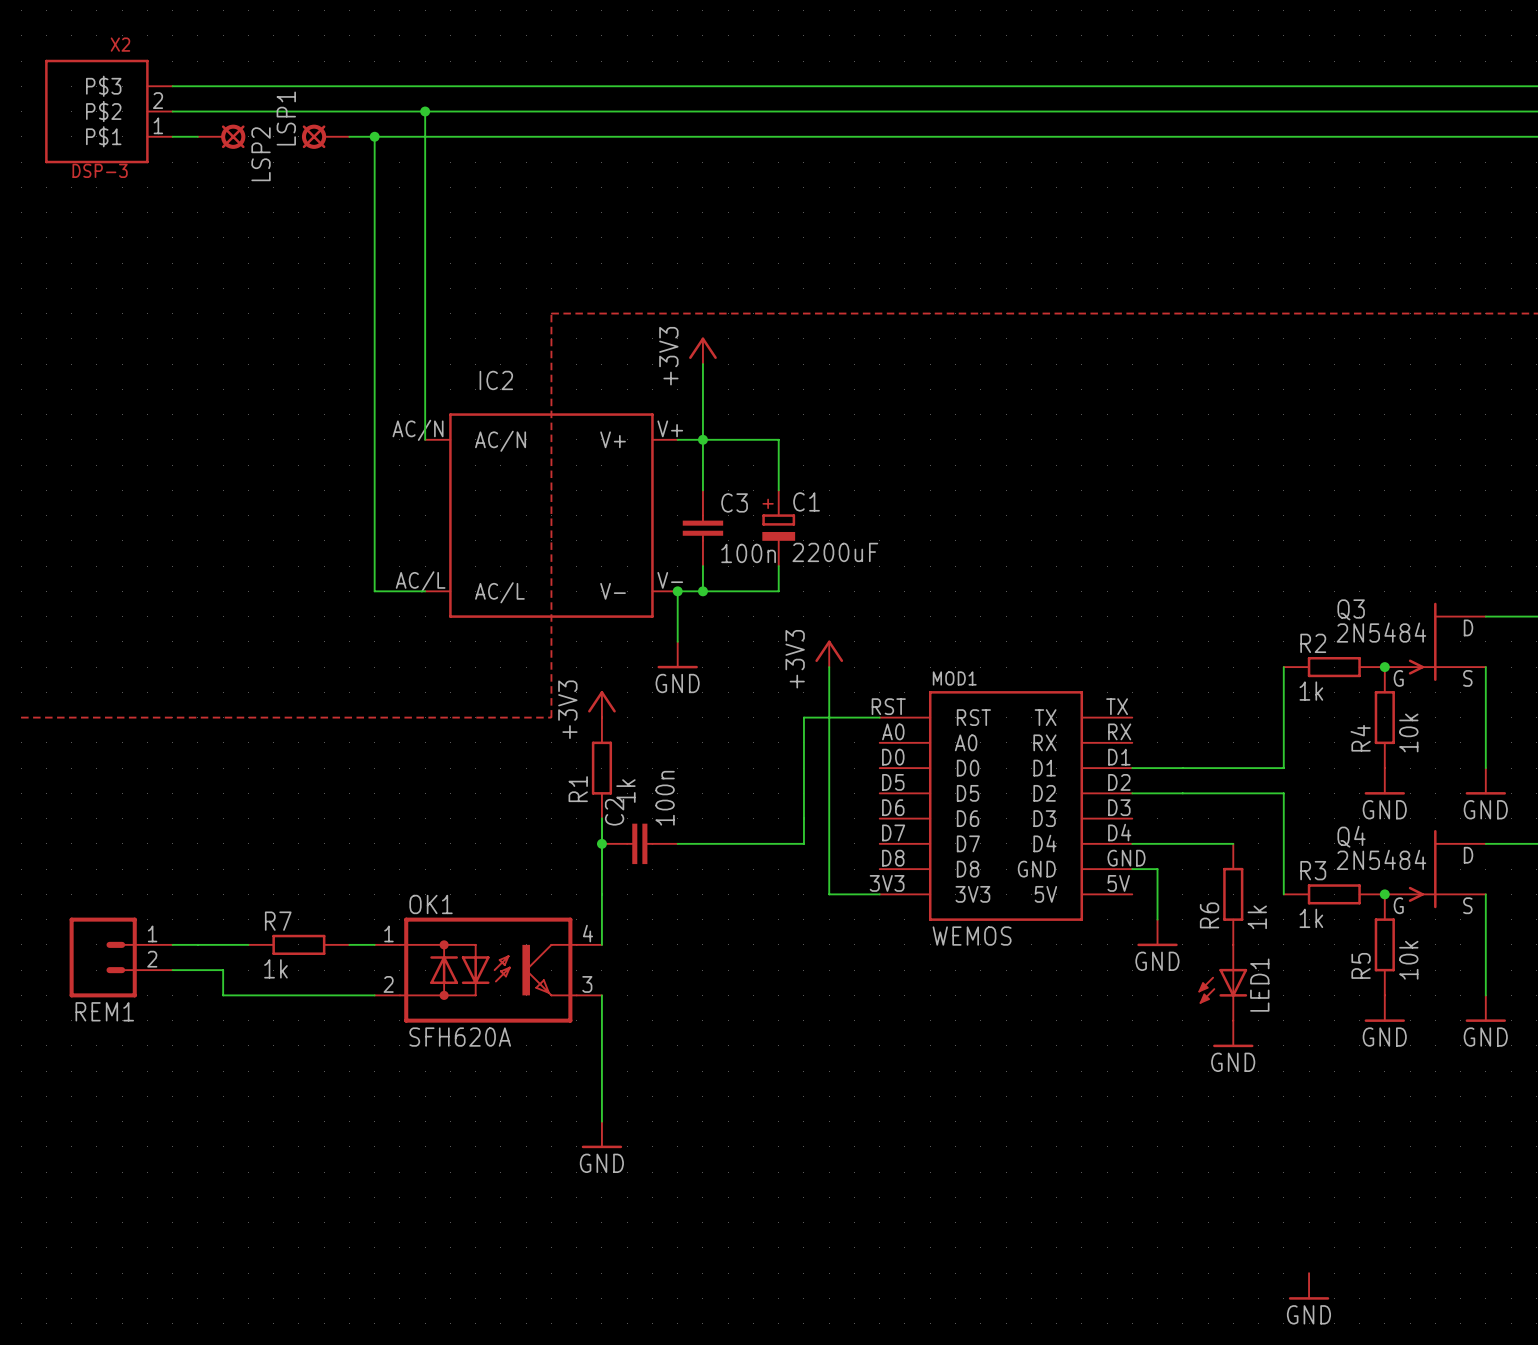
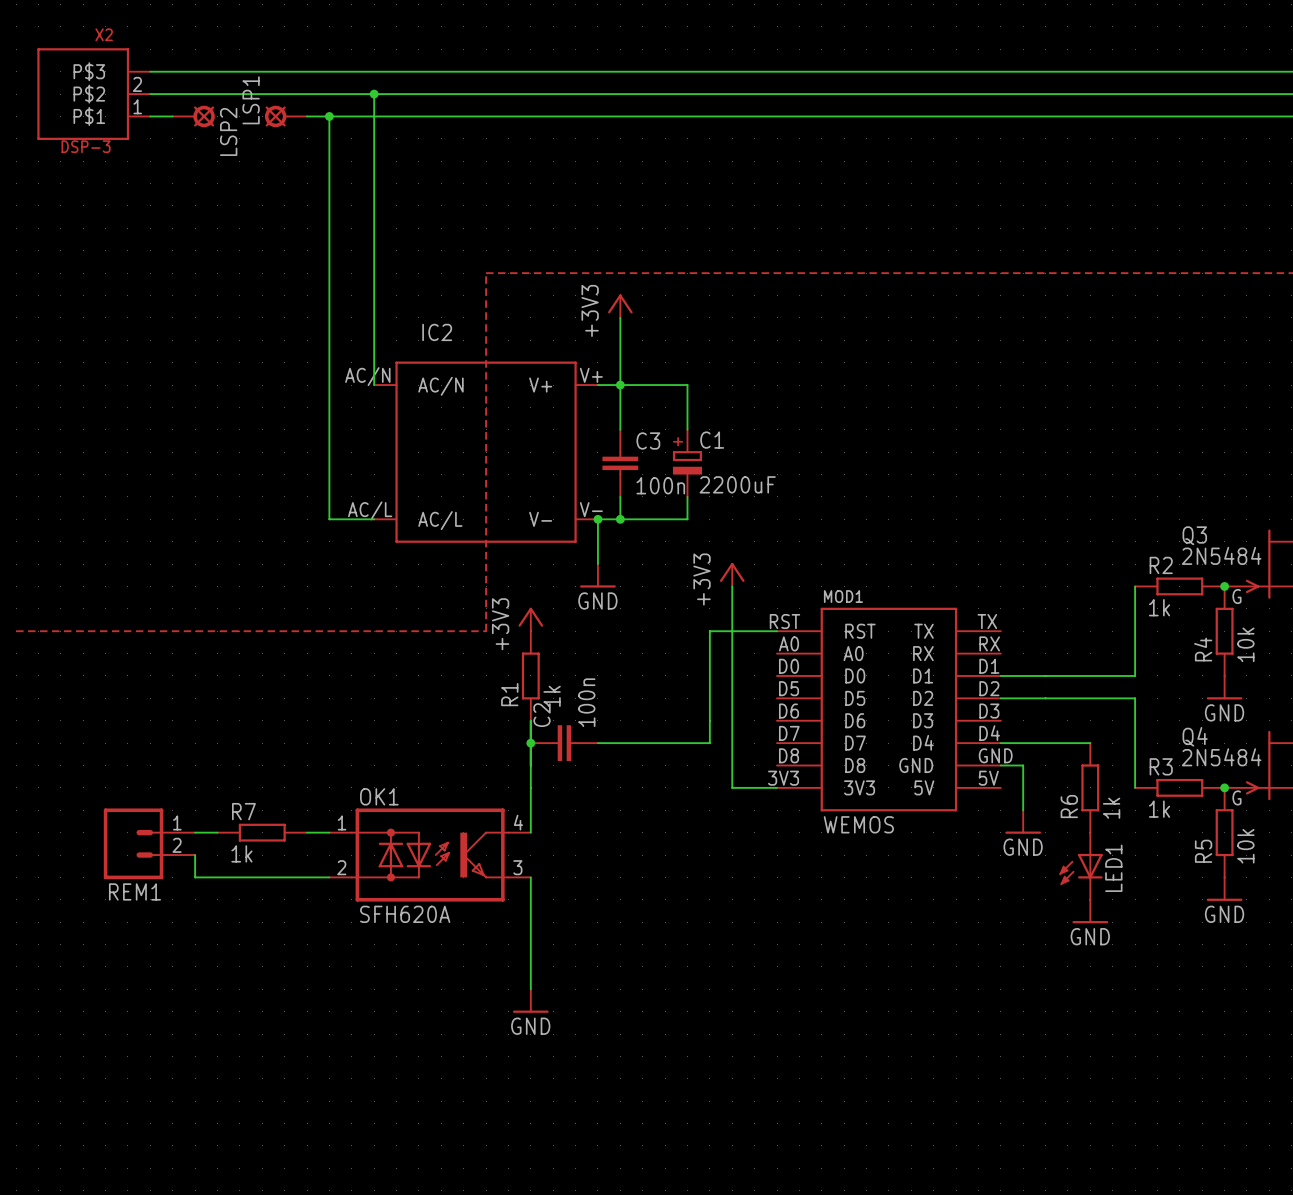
REM1 position: (121, 957) -> (149, 843)
power symbol: GND (1309, 1286) -> none

